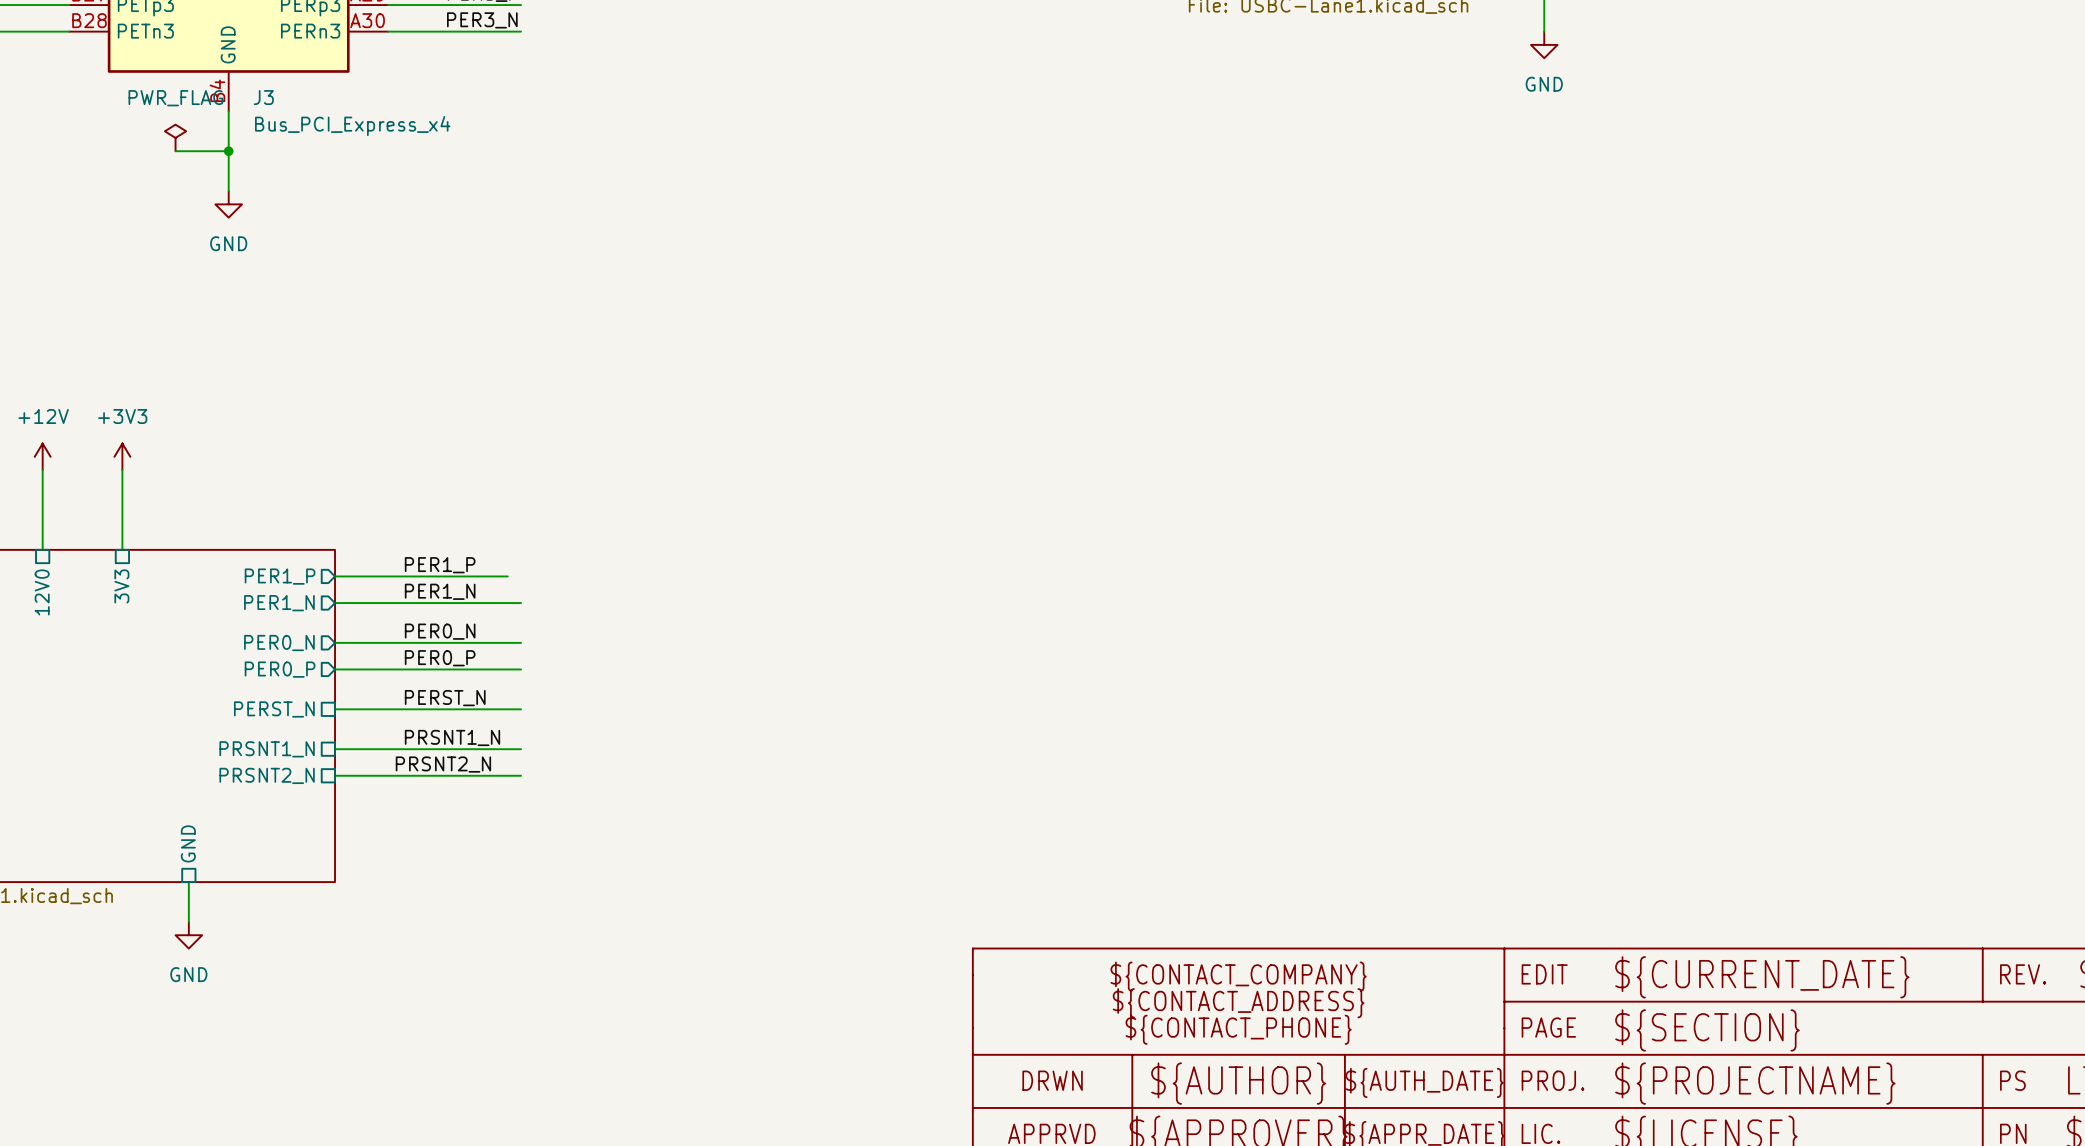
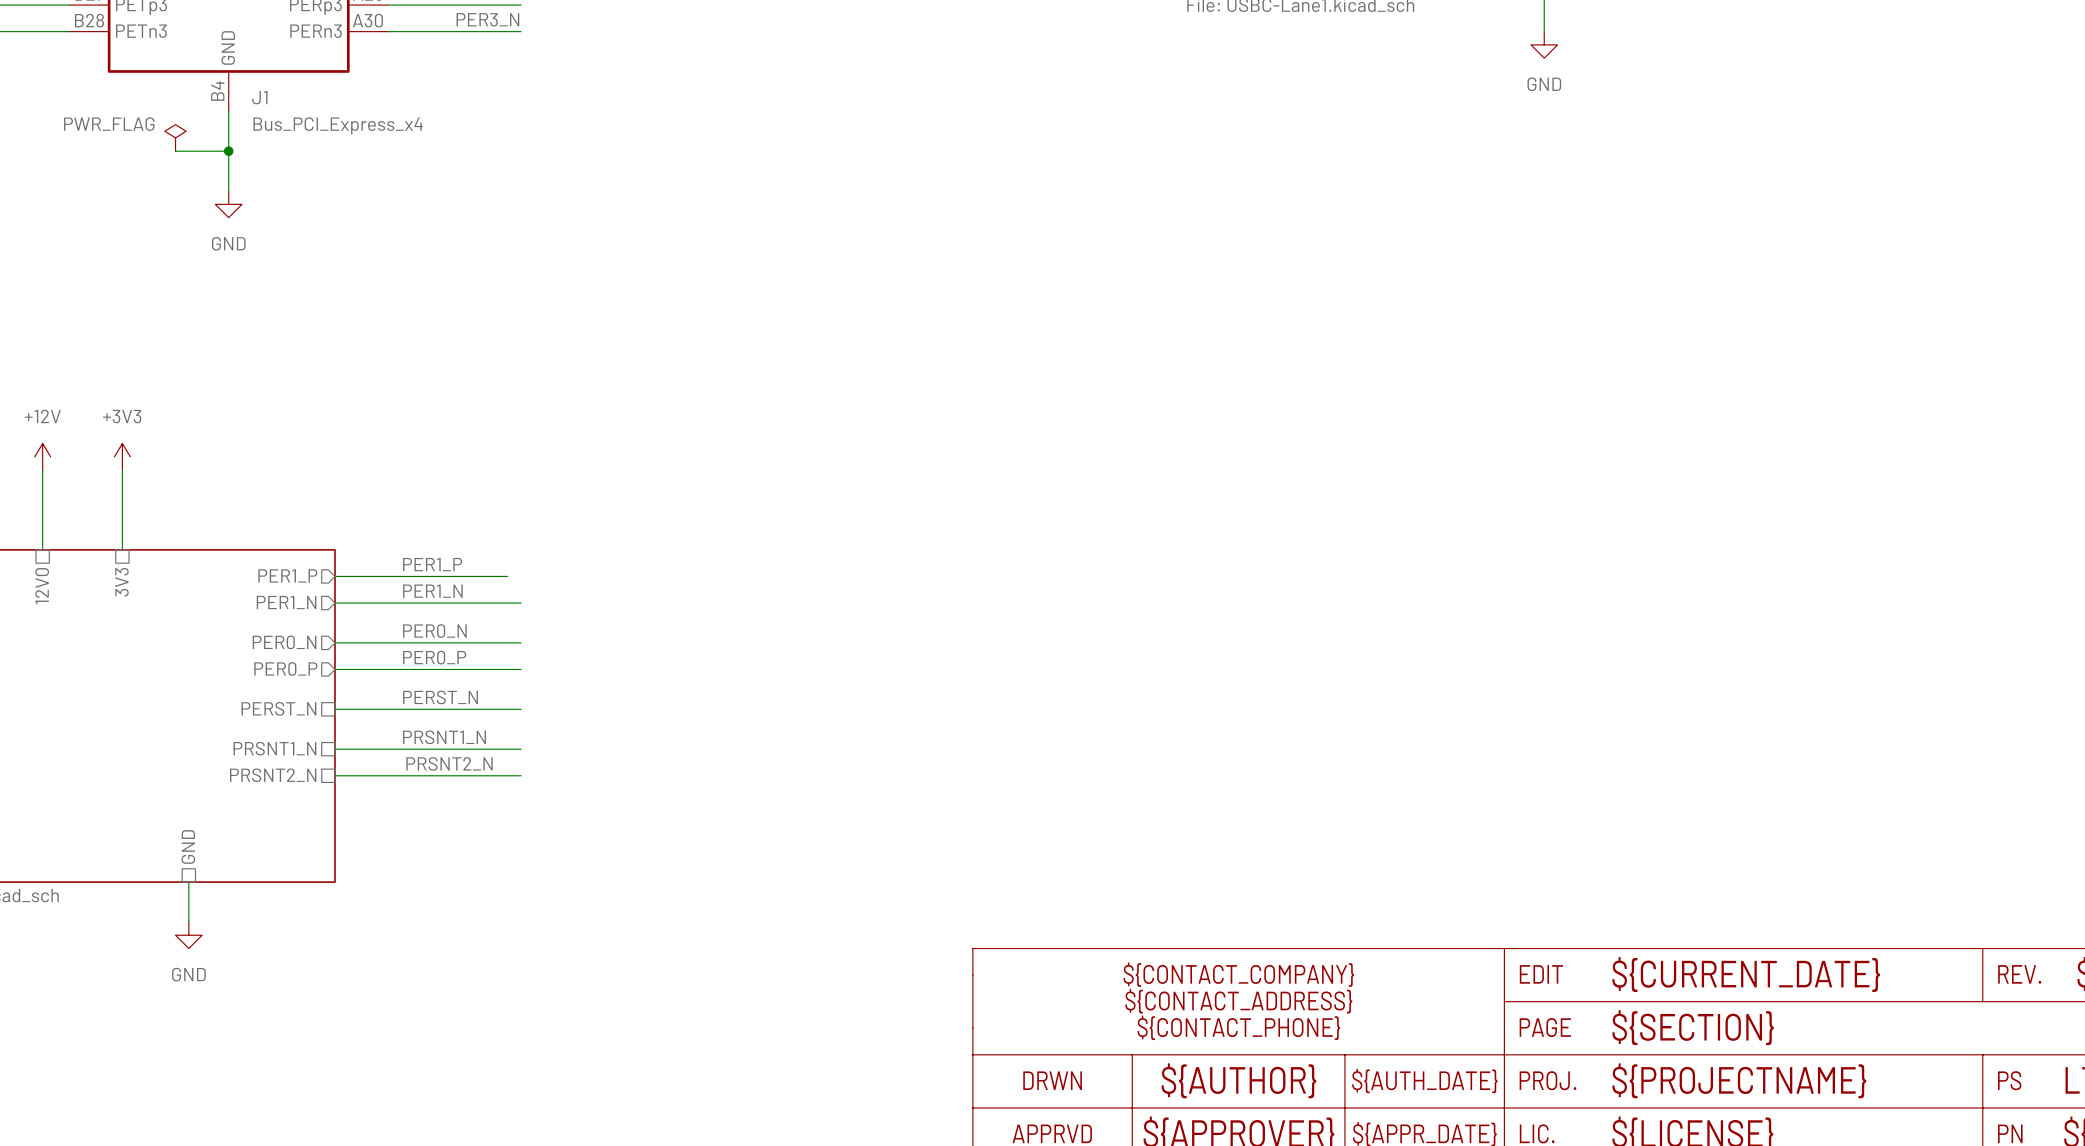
J3 name: J3 (263, 97) -> J1 (259, 97)
power symbol text position: PWR_FLAG (175, 98) -> PWR_FLAG (109, 124)

